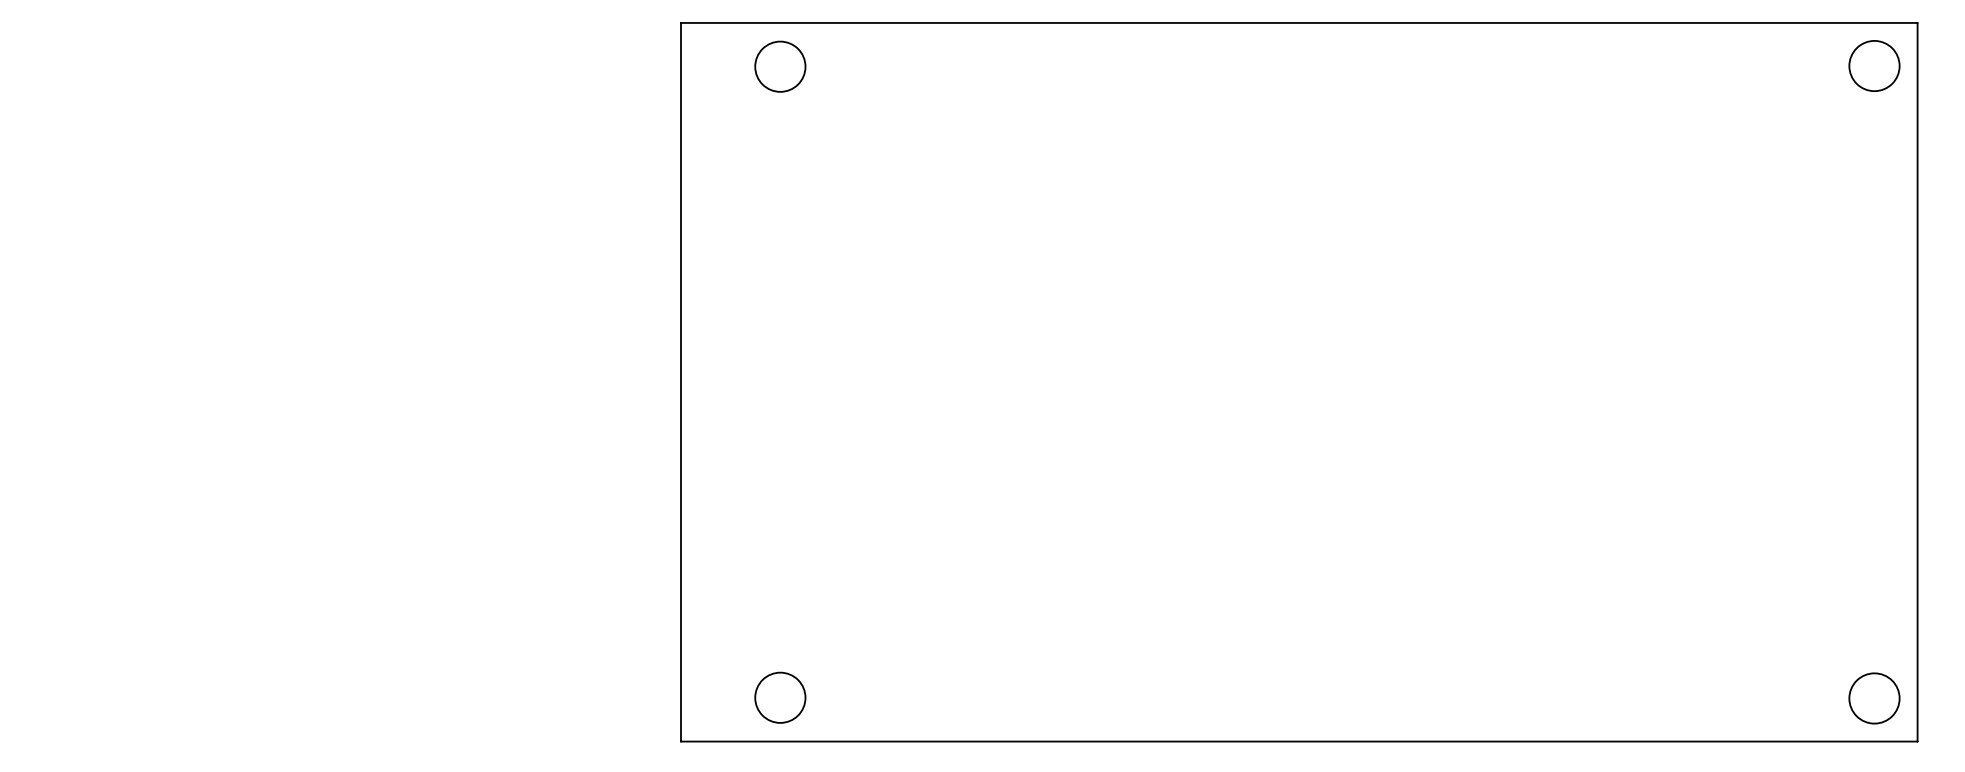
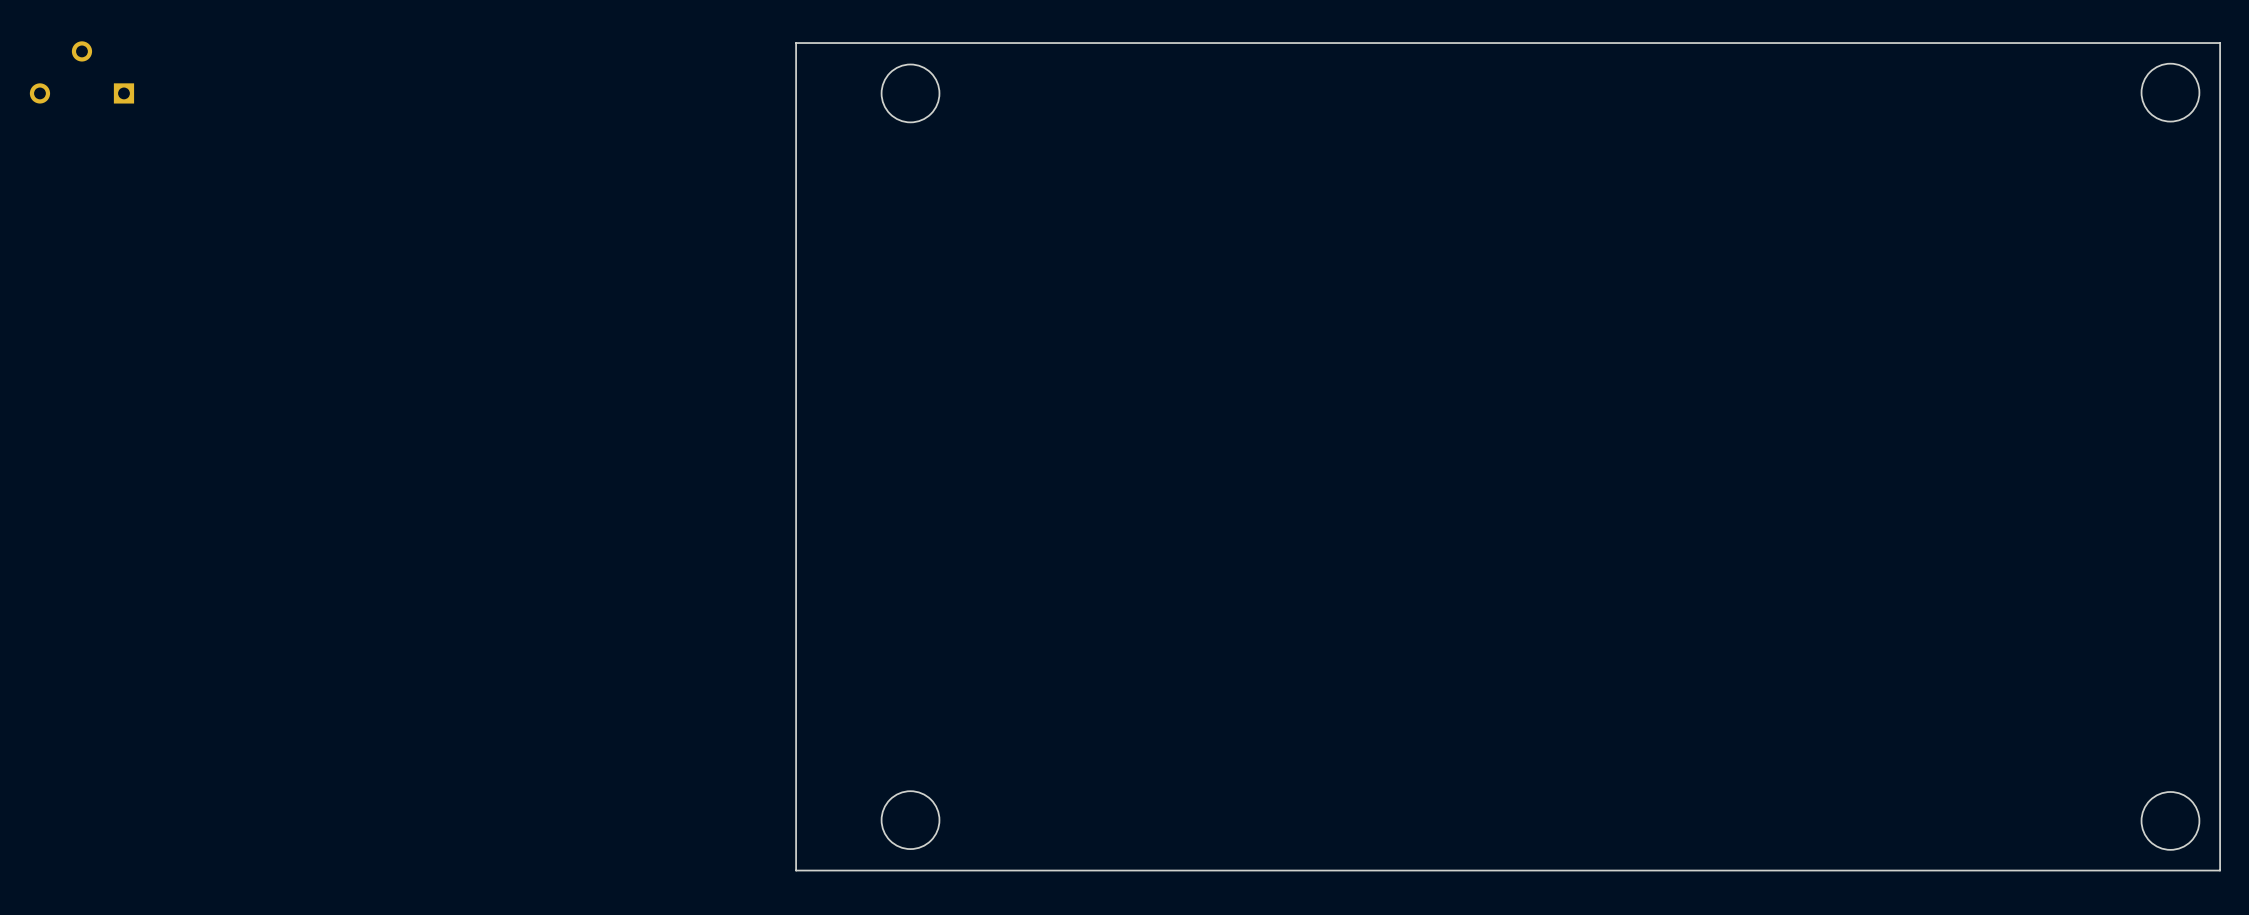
part: none -> (81, 72)

